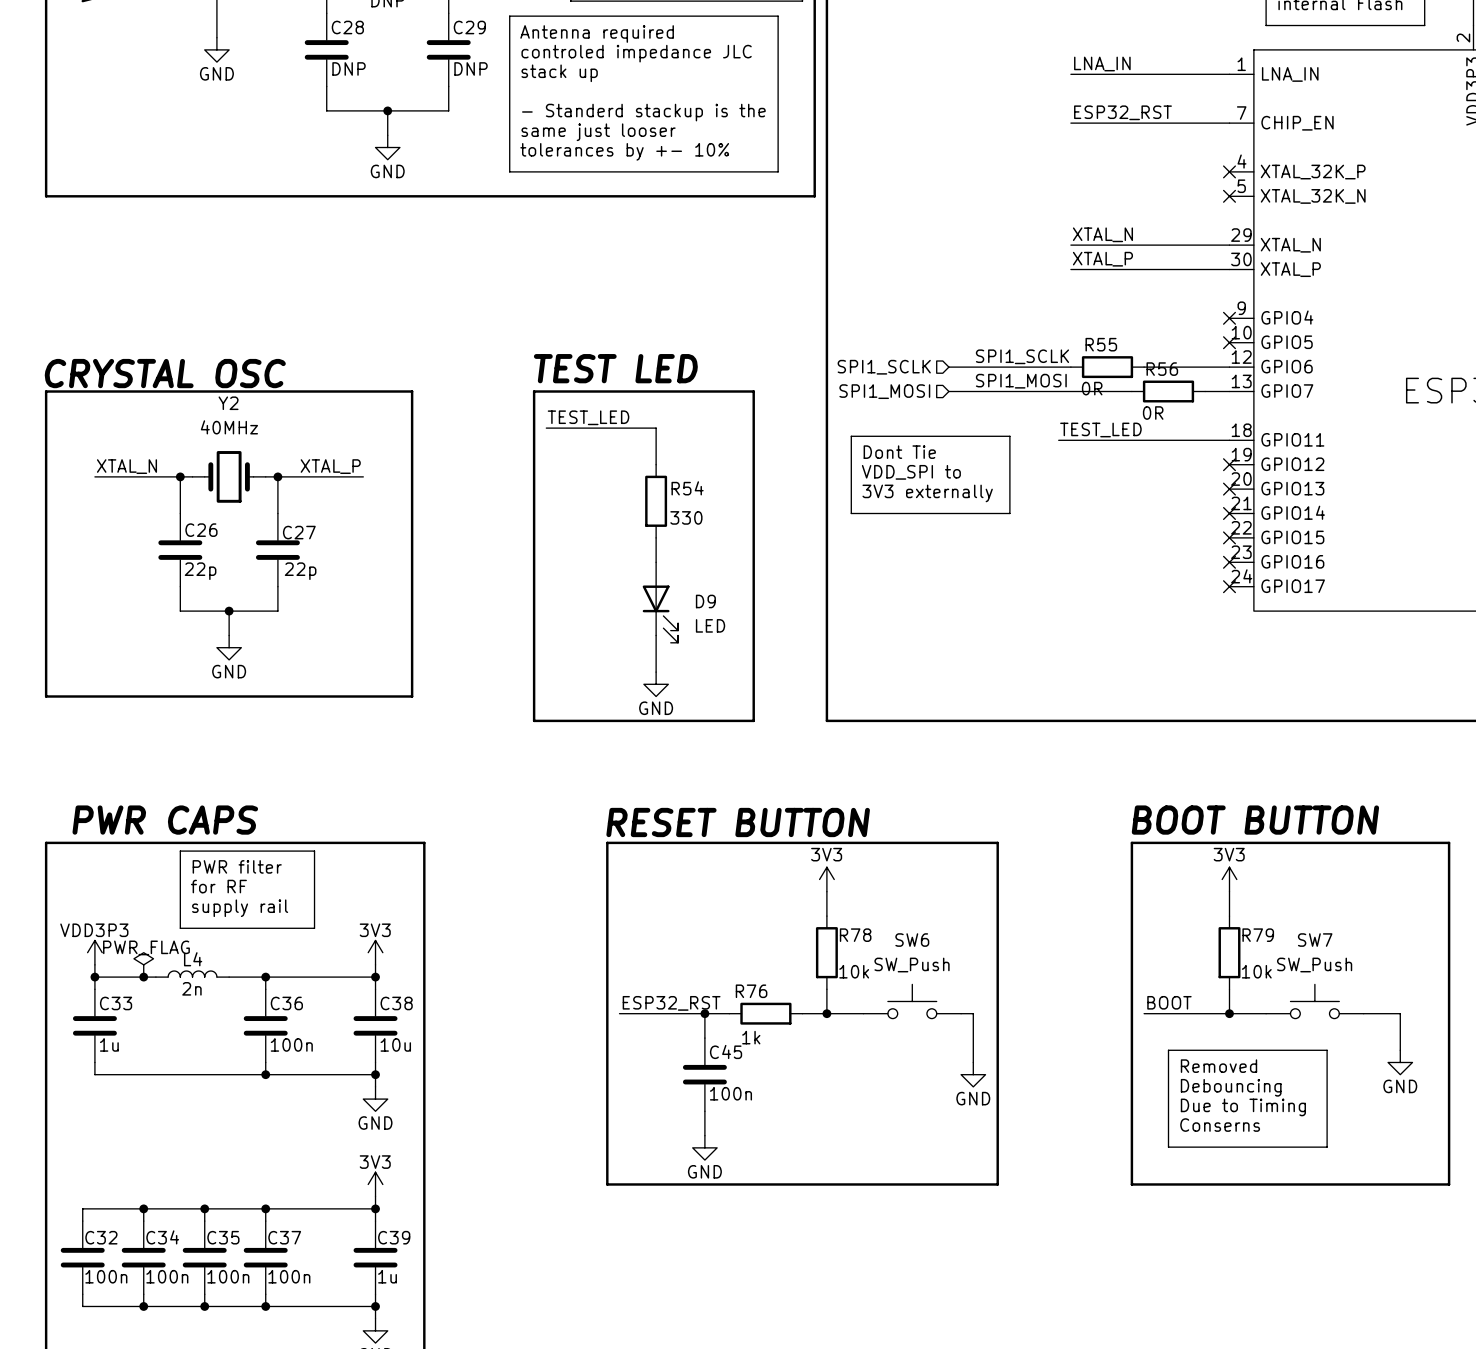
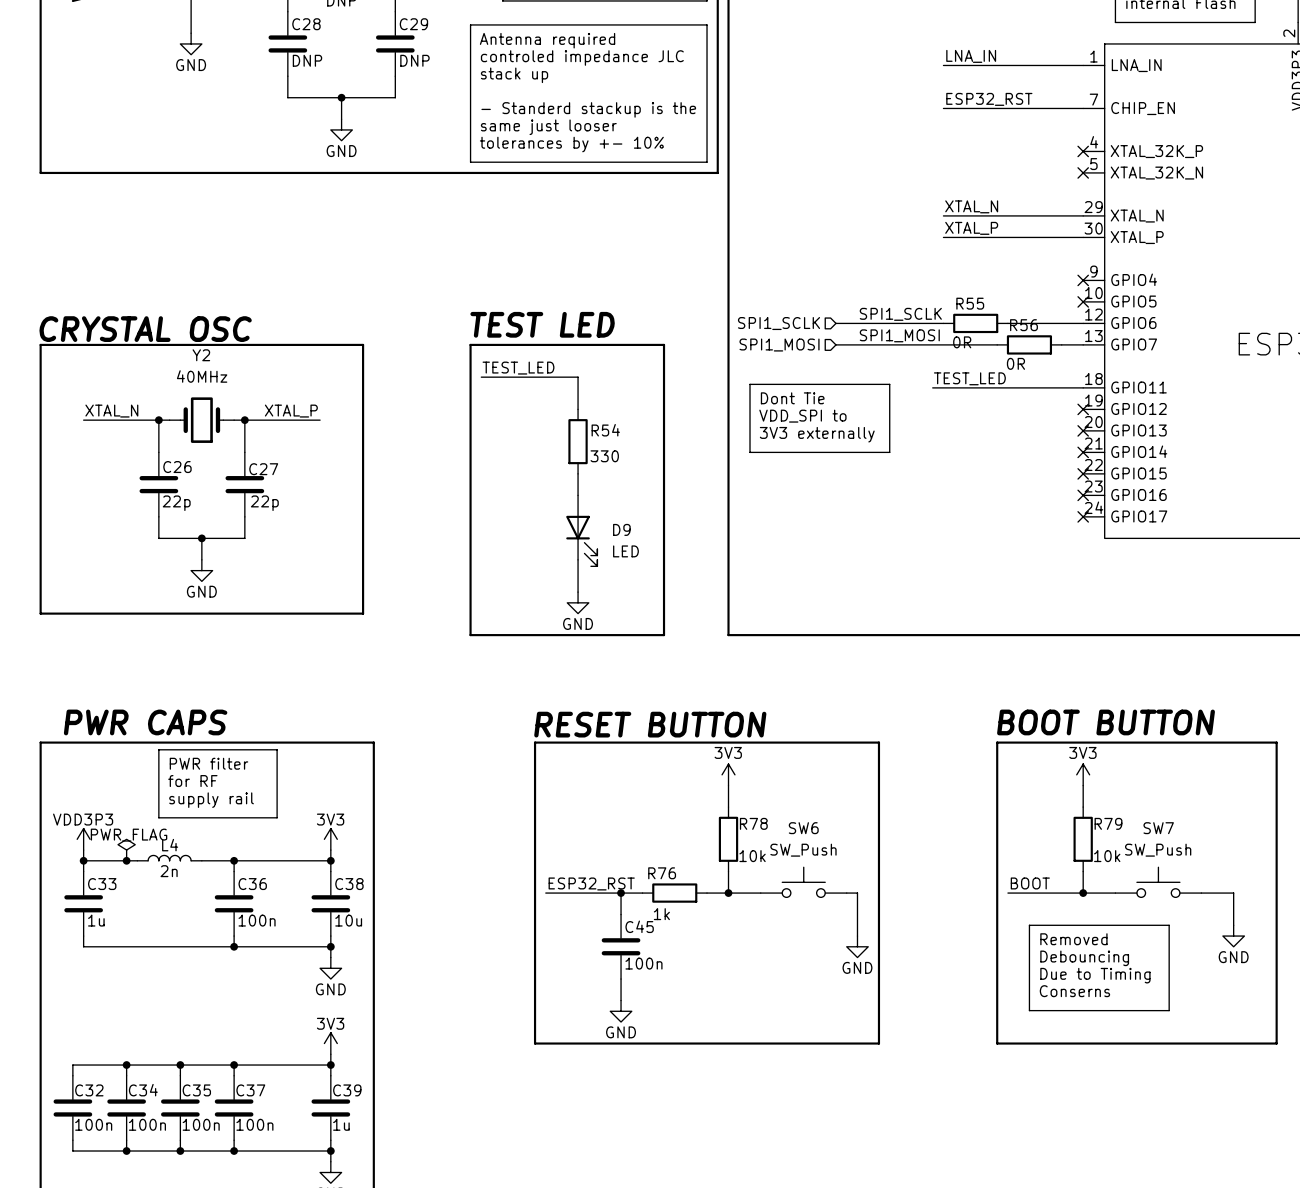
line: (509, 16) (778, 16) (778, 171) (509, 171) (509, 16) -> (470, 24) (707, 24) (707, 162) (470, 162) (470, 24)
text position: Antenna required (597, 34) -> Antenna required (547, 40)
text position: controled impedance JLC (636, 53) -> controled impedance JLC (582, 58)
text position: stack up (559, 73) -> stack up (514, 75)
text position: - Standerd stackup is the (643, 112) -> - Standerd stackup is the (588, 109)
text position: same just looser (598, 132) -> same just looser (548, 127)
text position: tolerances by +- 10% (624, 151) -> tolerances by +- 10% (571, 144)

